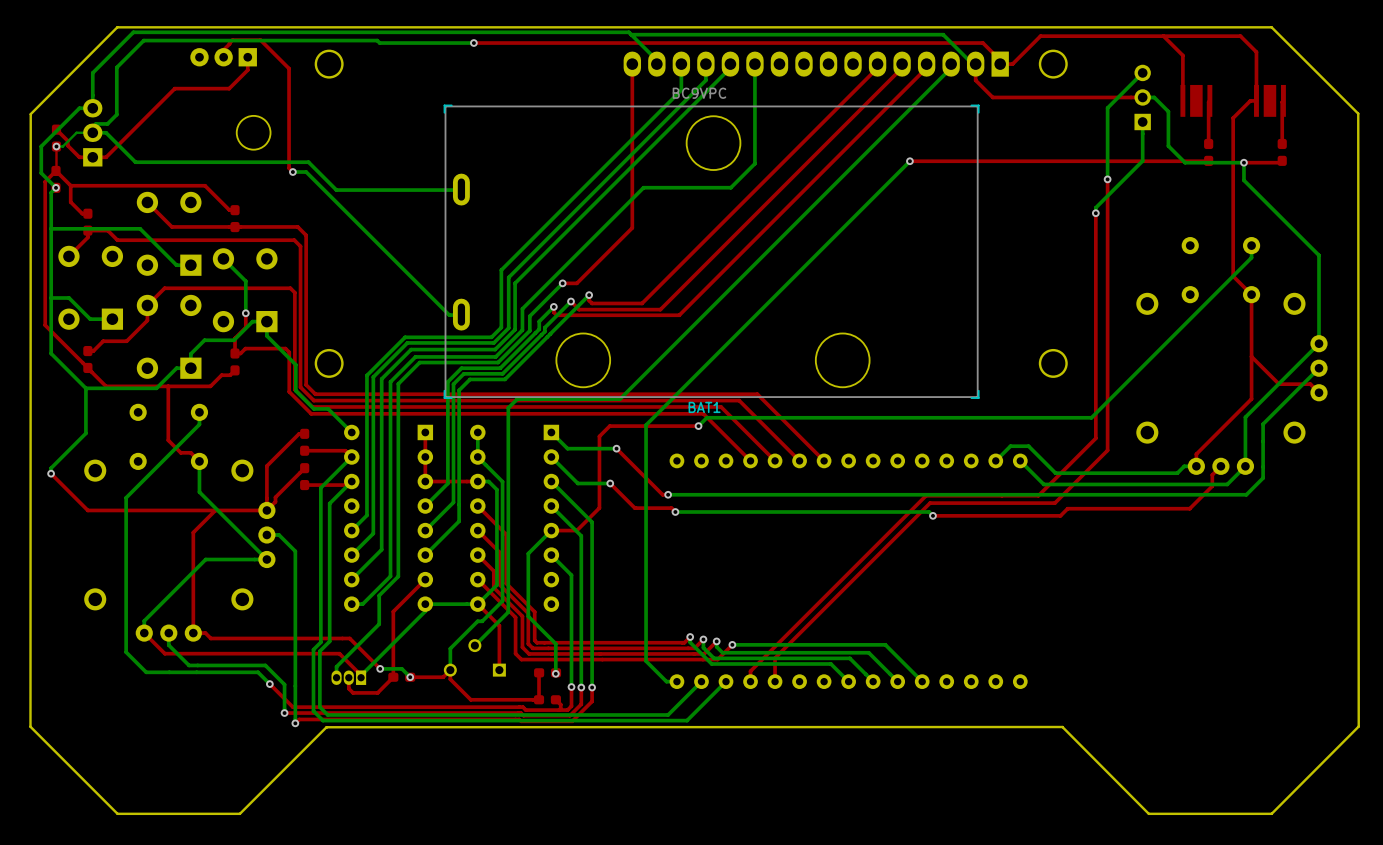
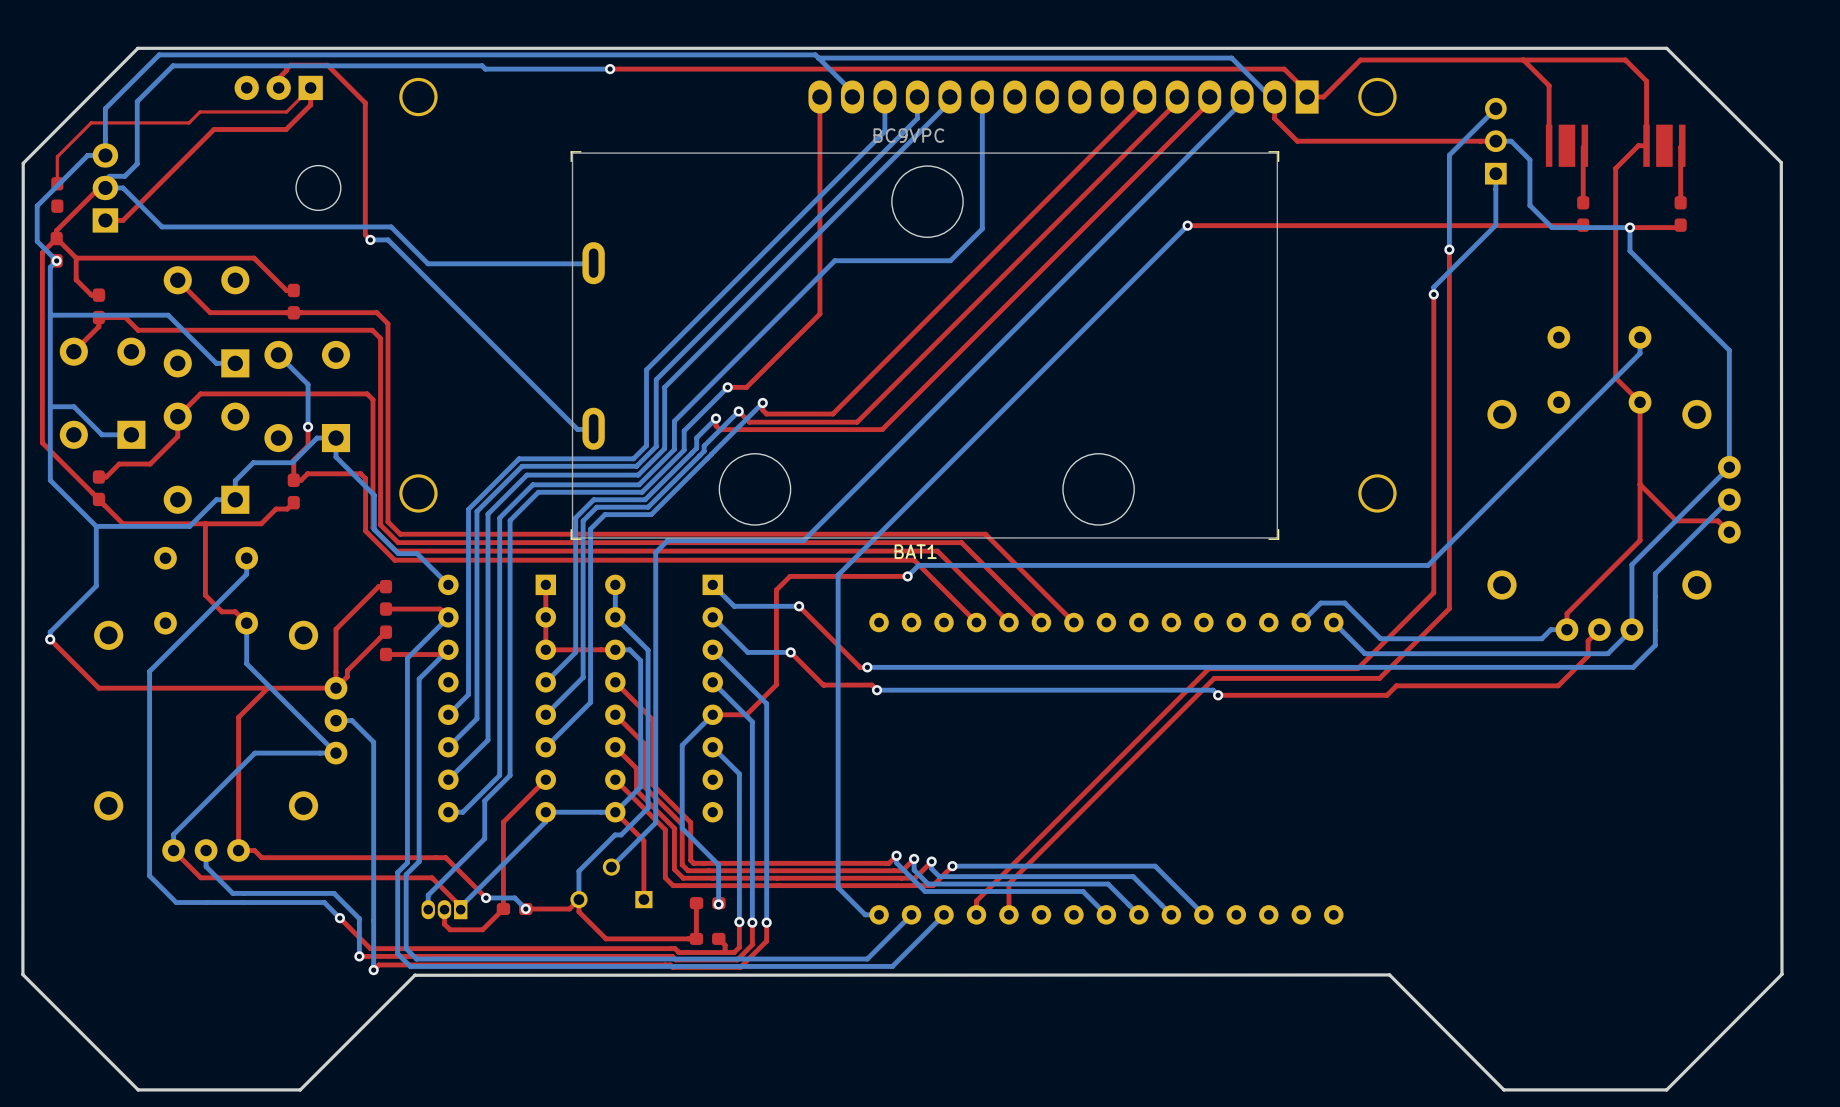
top track: (56, 129) (67, 140) (67, 145) (79, 157) (92, 157) -> (57, 183) (57, 156) (91, 122) (189, 122) (200, 111) (286, 111) (304, 94)
bottom track: (92, 132) (76, 132) (62, 146) (56, 146) -> none
via: (56, 146) -> none
top track: (55, 147) (55, 170) -> (99, 187) (56, 230) (56, 237)

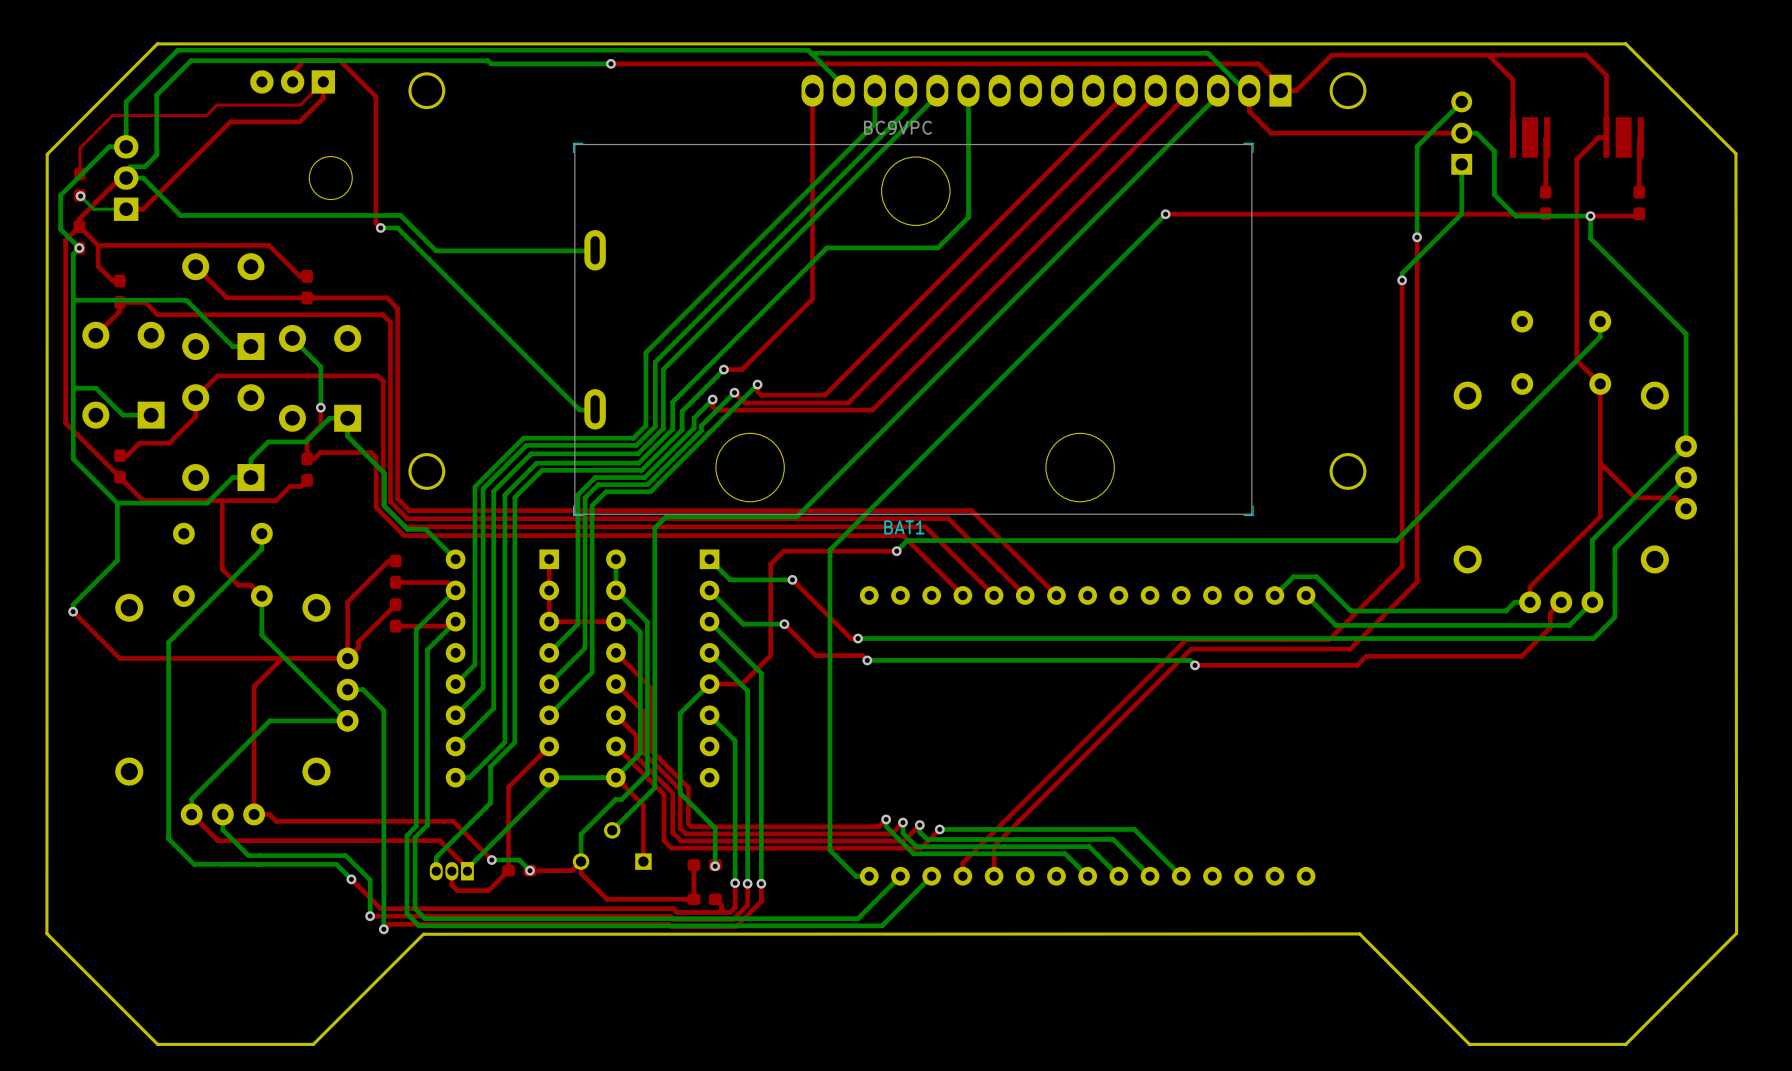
bottom track: none -> (80, 196) (93, 209) (126, 209)
via: none -> (80, 196)

